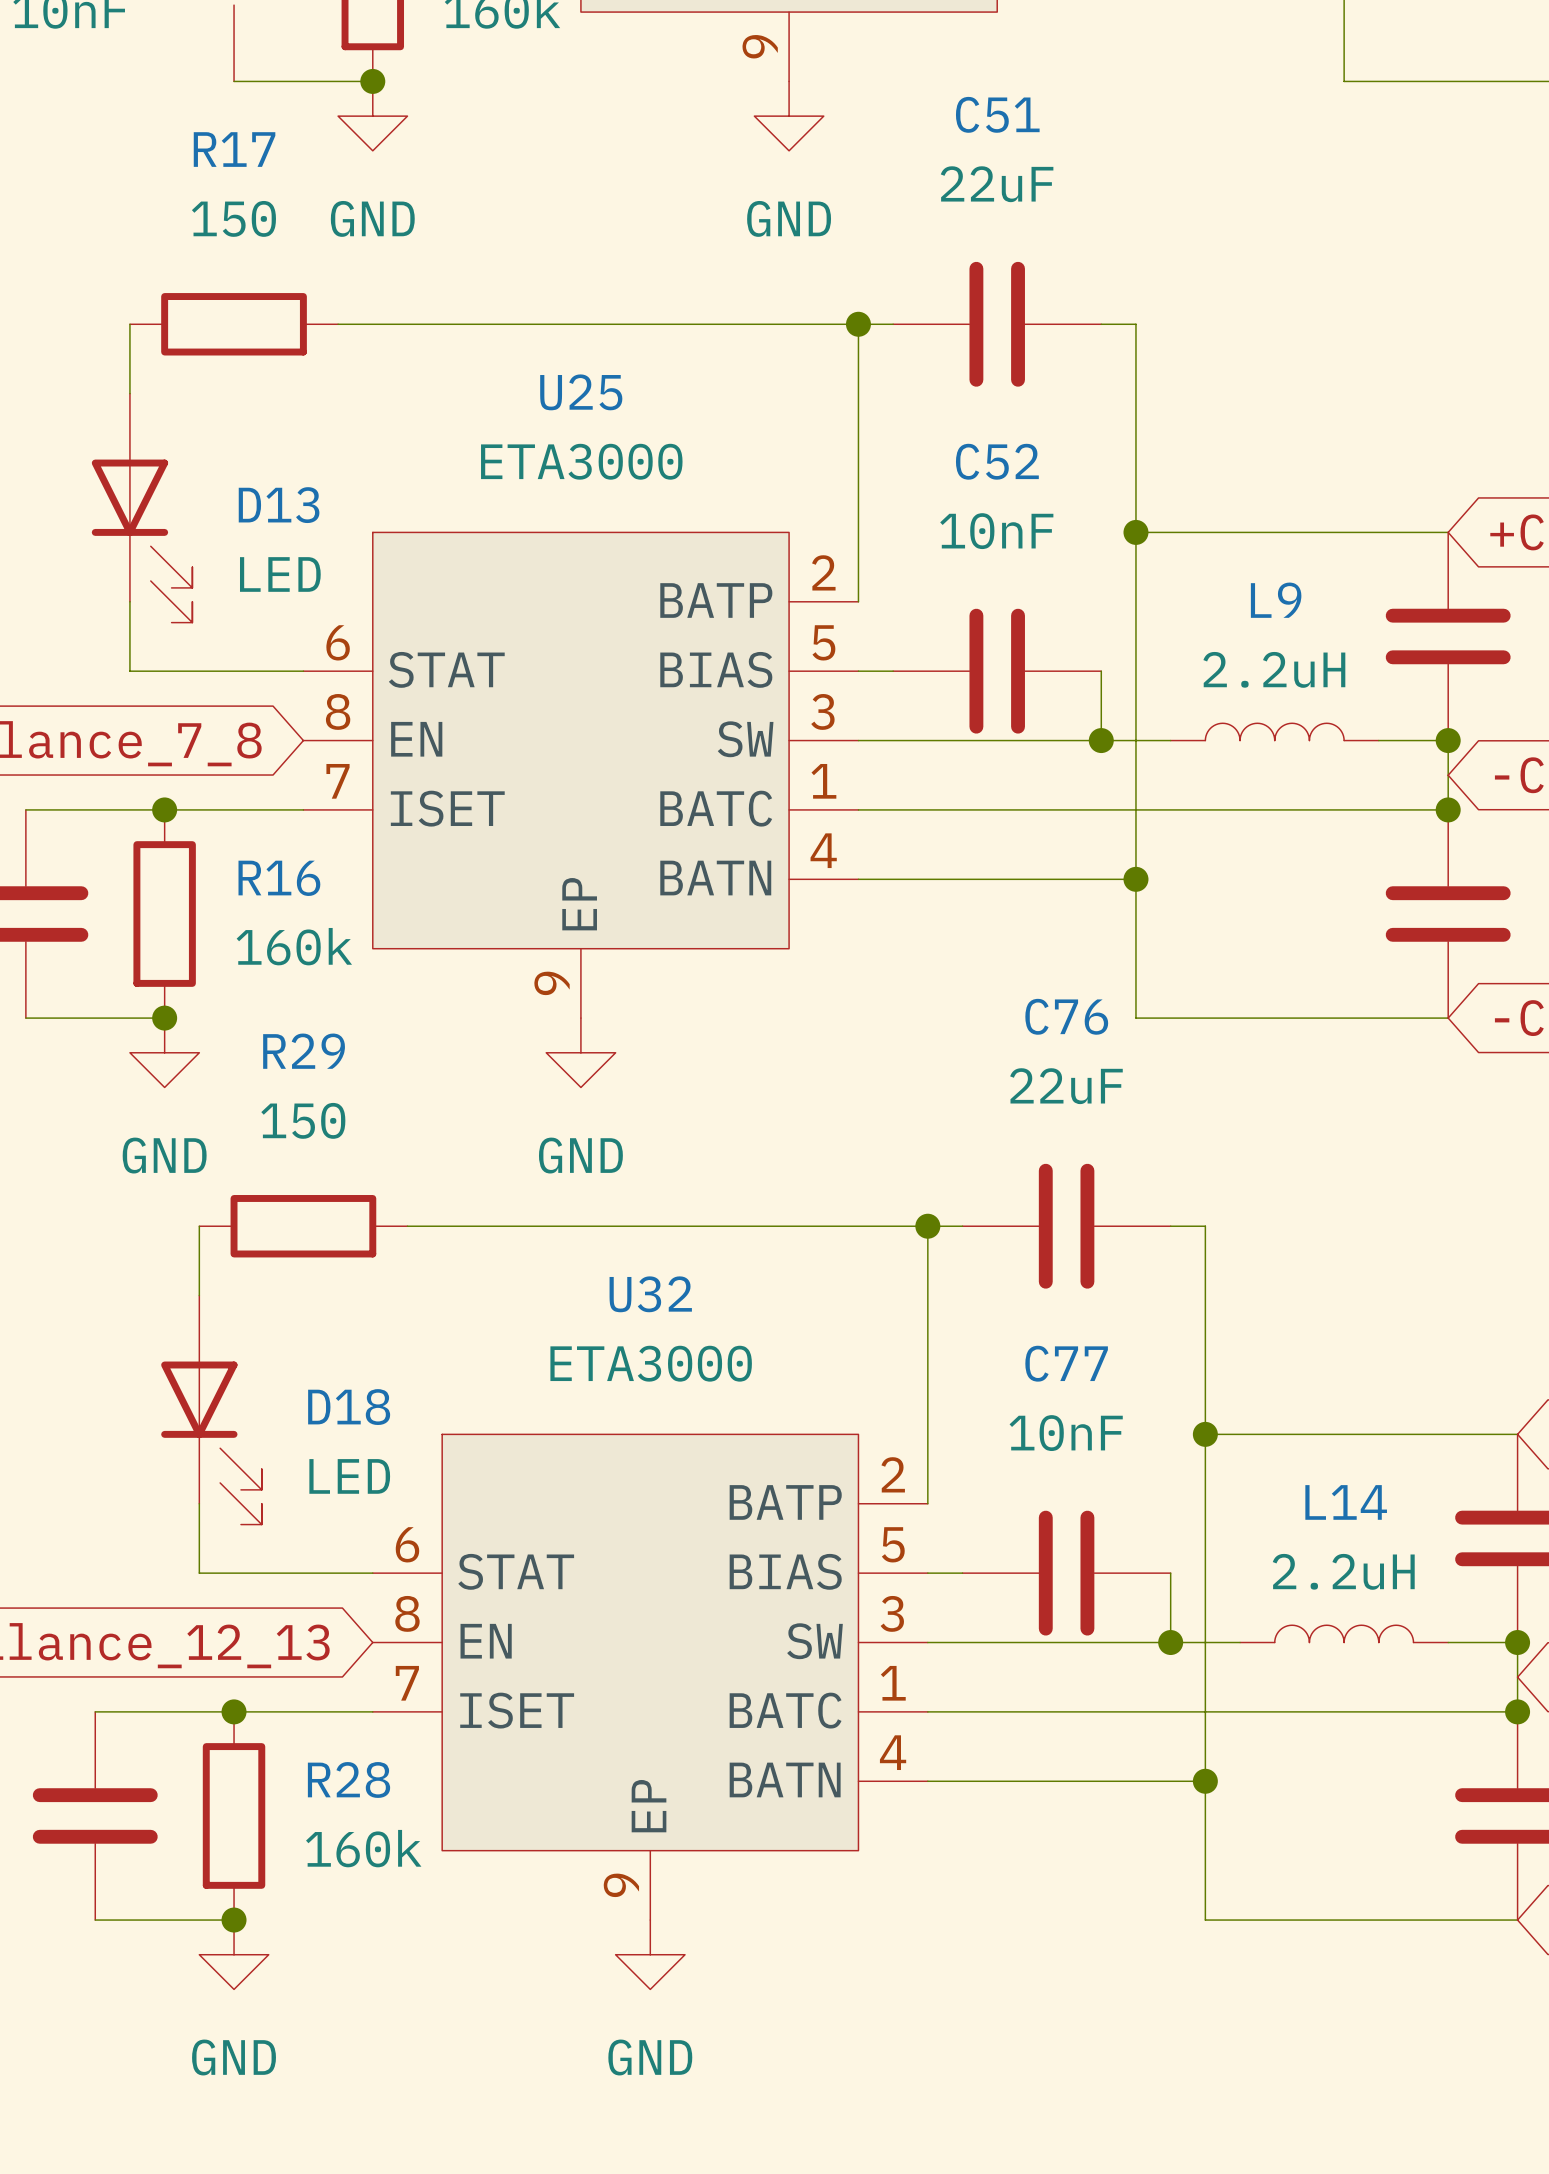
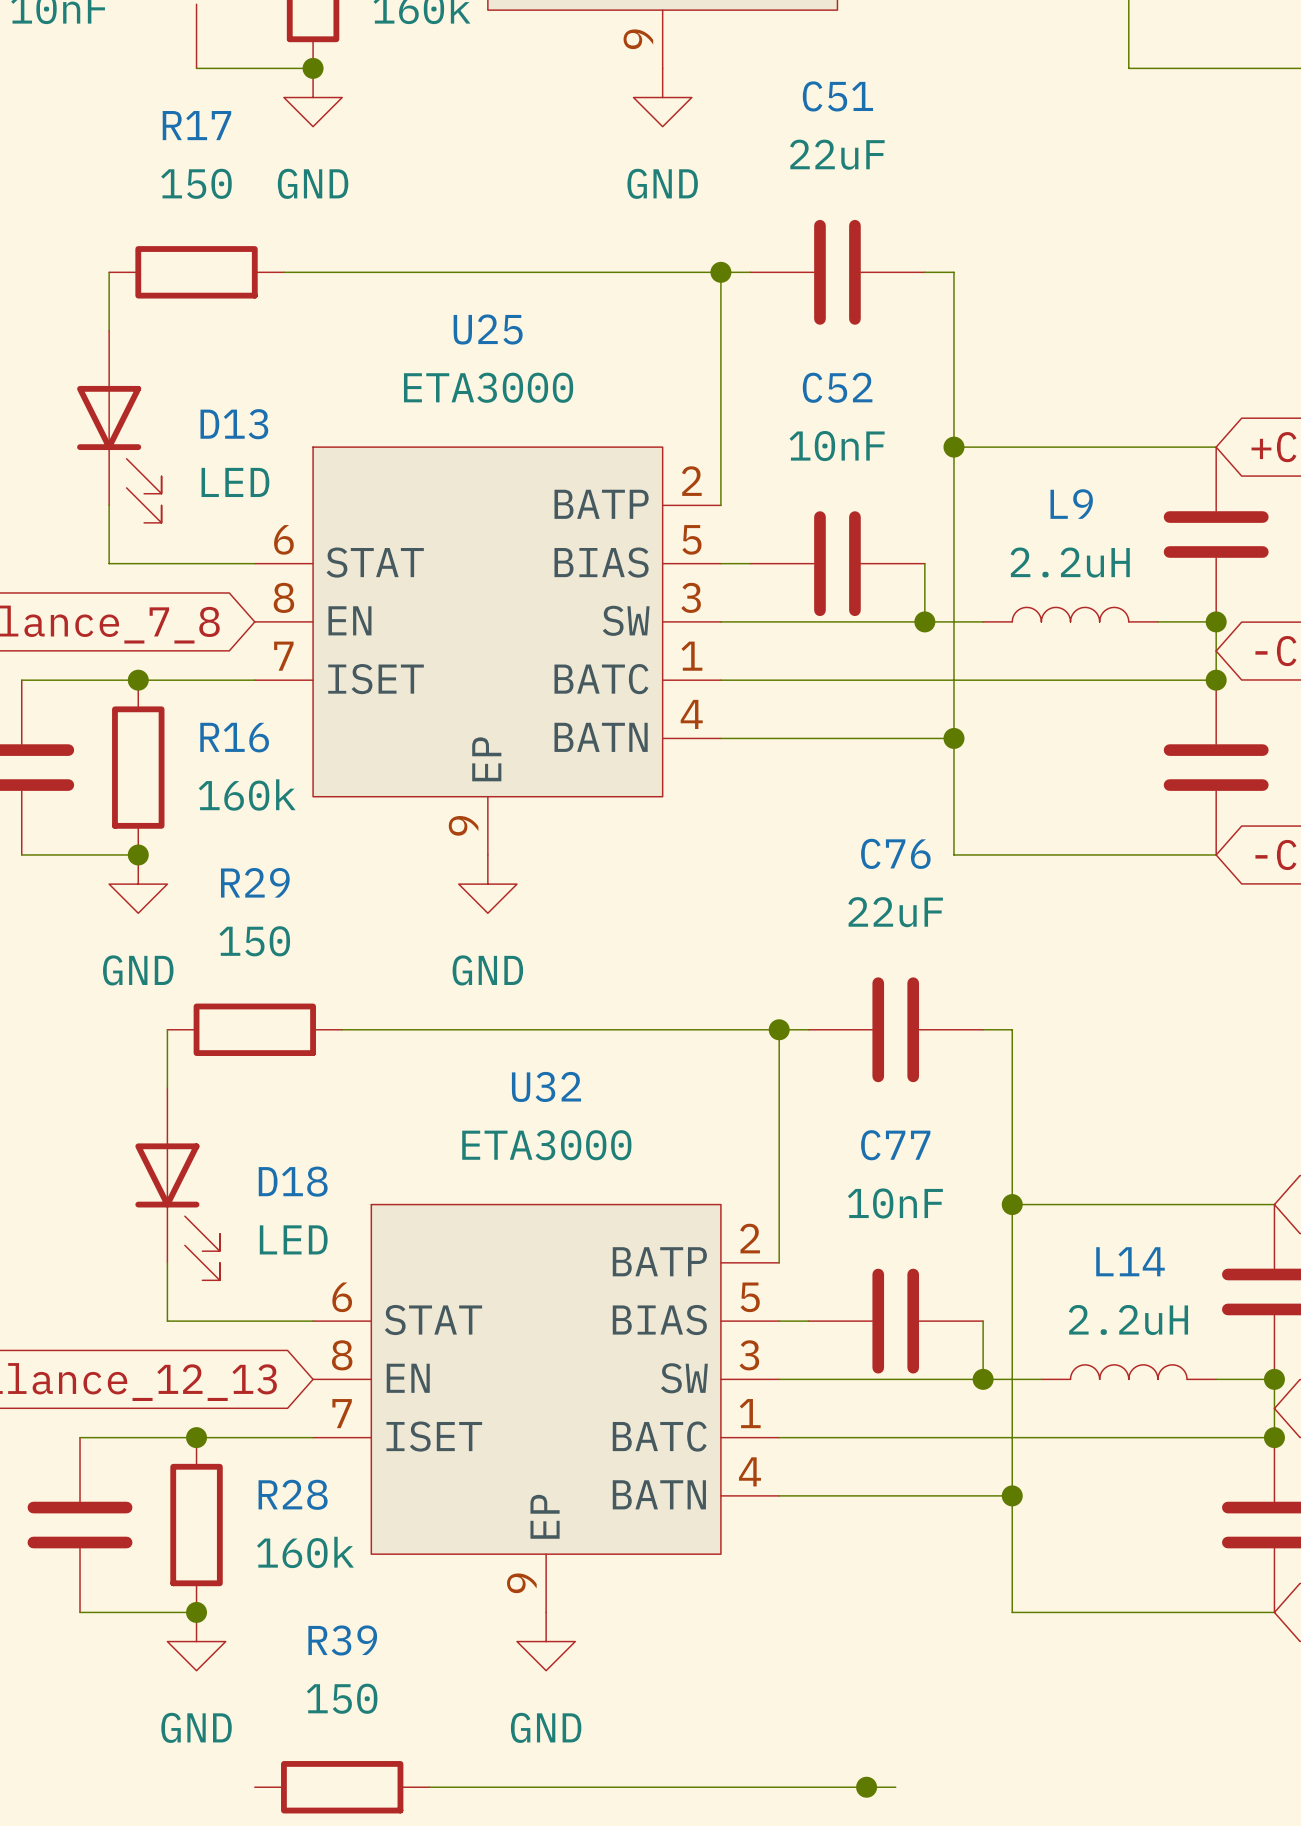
R39: none -> 150 (342, 1787)
wire: none -> (429, 1787) (895, 1787)
junction: none -> (866, 1787)

